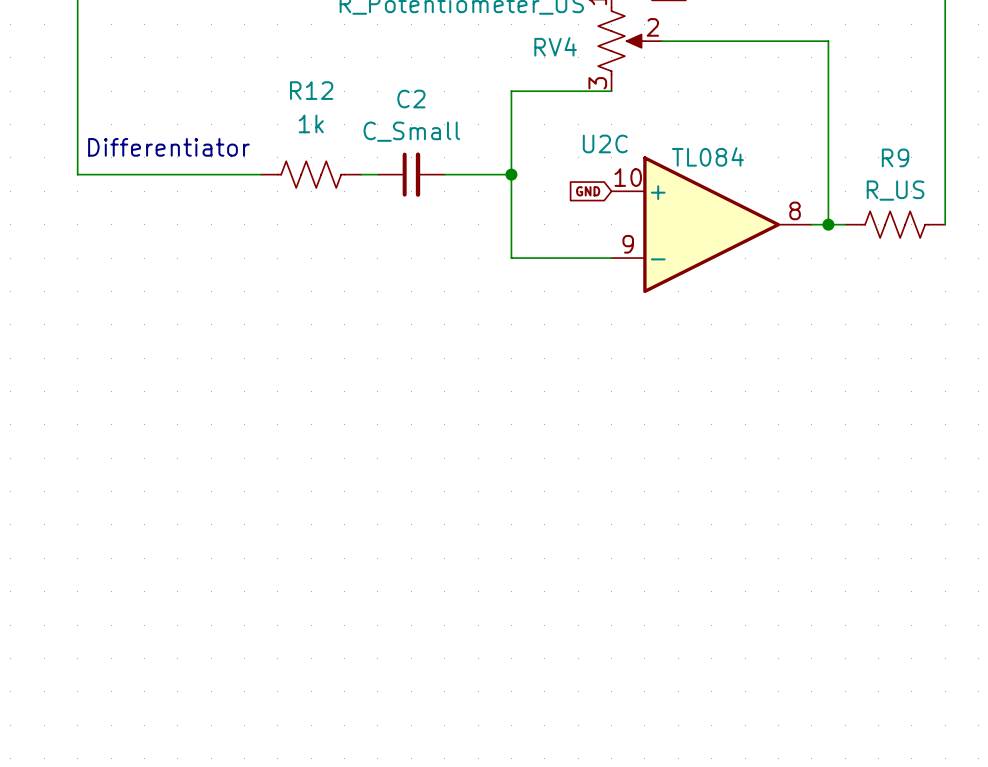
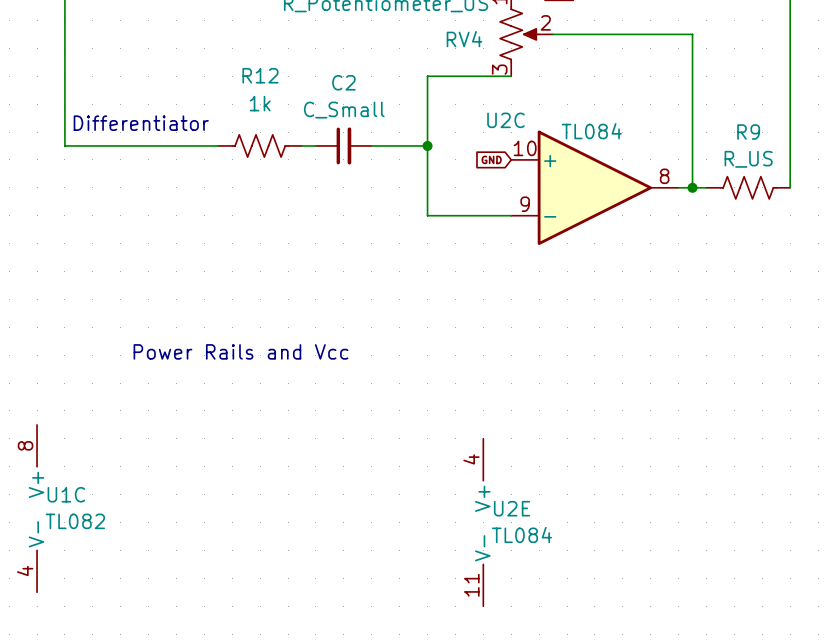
text: none -> Power Rails and Vcc (240, 351)
U1C: none -> TL082 (37, 508)
U2E: none -> TL084 (483, 522)

